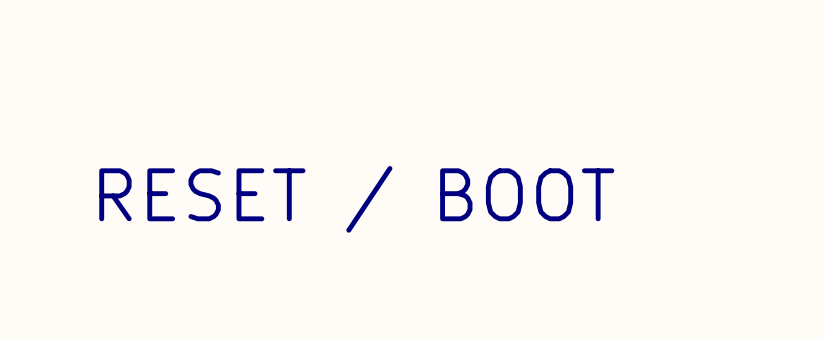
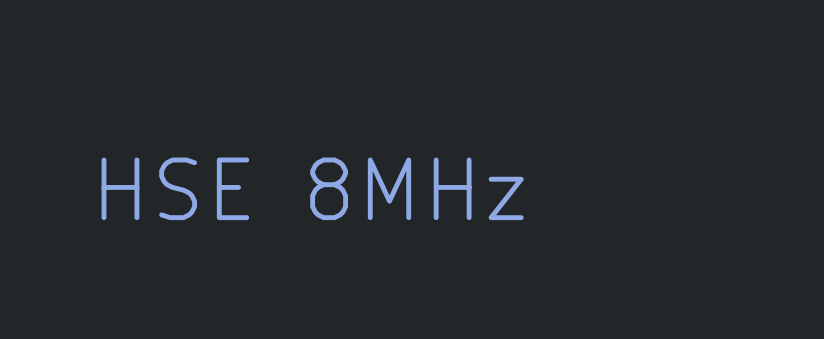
text: RESET / BOOT (356, 199) -> HSE 8MHz (312, 188)

